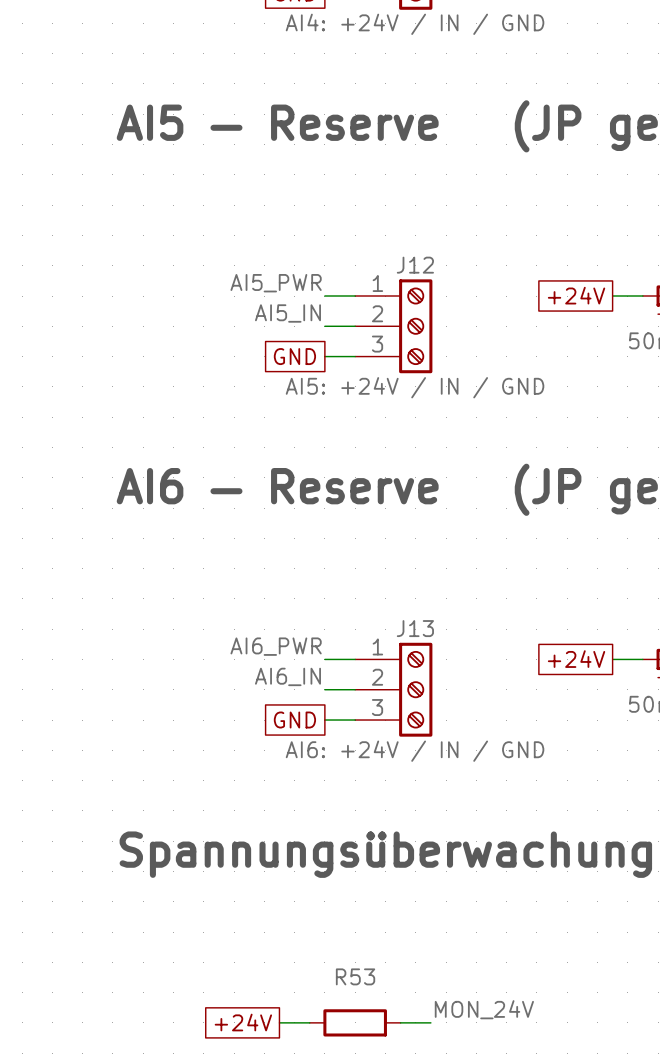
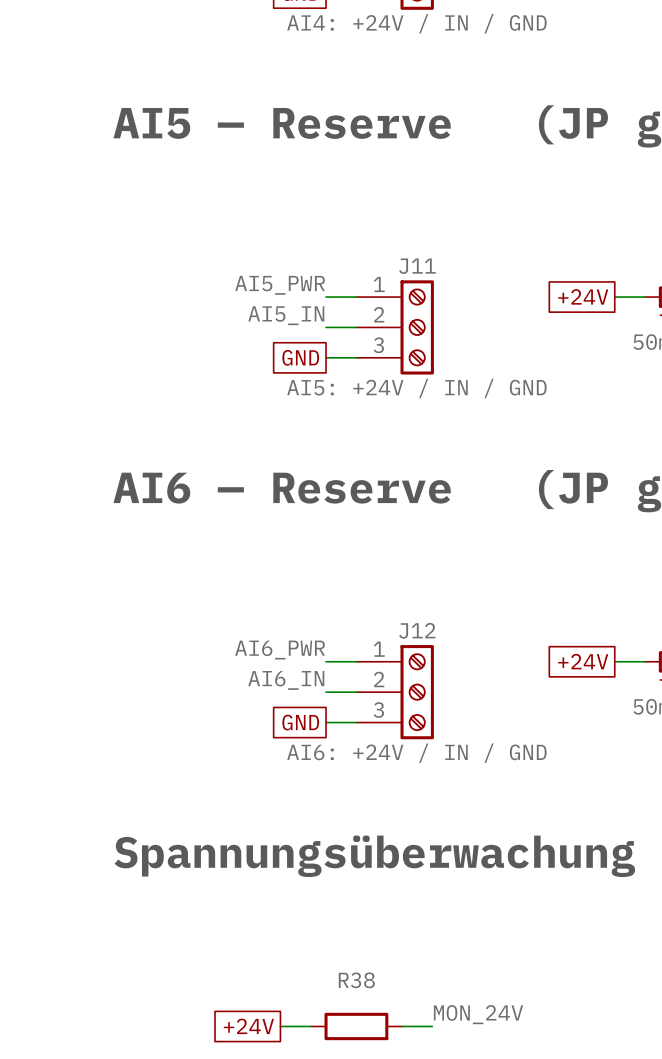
J12 name: J12 (415, 265) -> J11 (417, 266)
J13 name: J13 (415, 628) -> J12 (417, 630)
R53 name: R53 (355, 976) -> R38 (356, 980)

